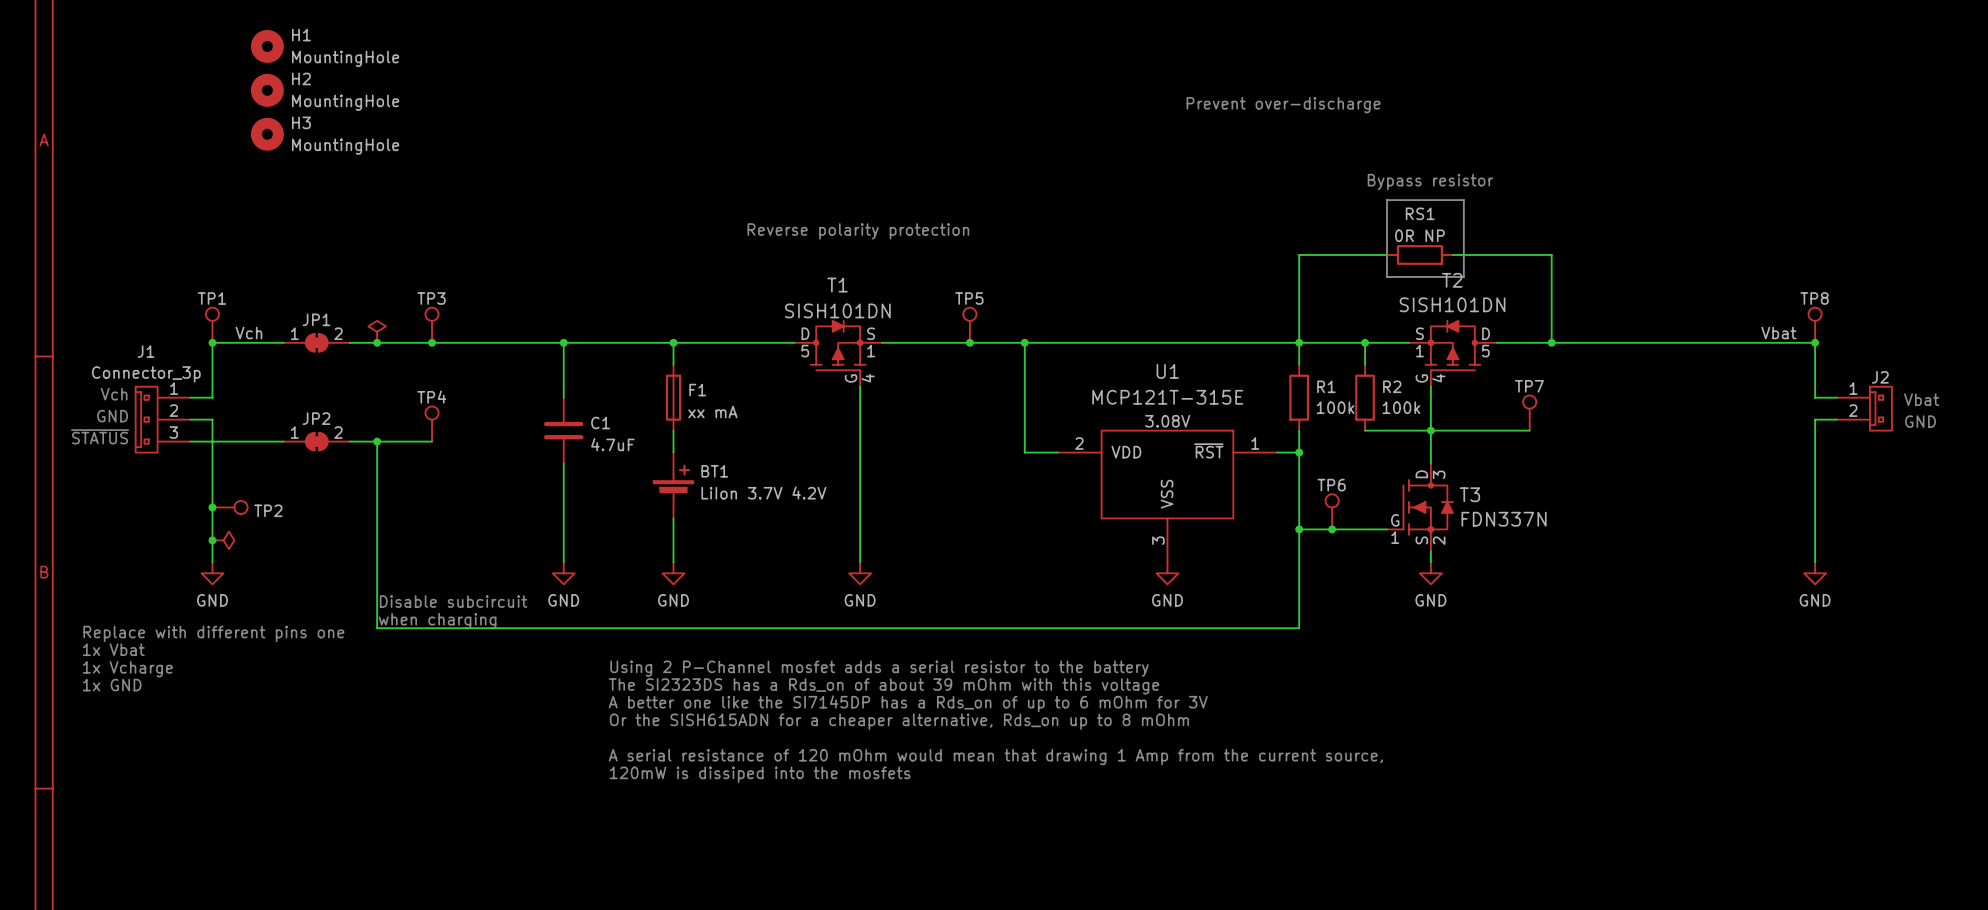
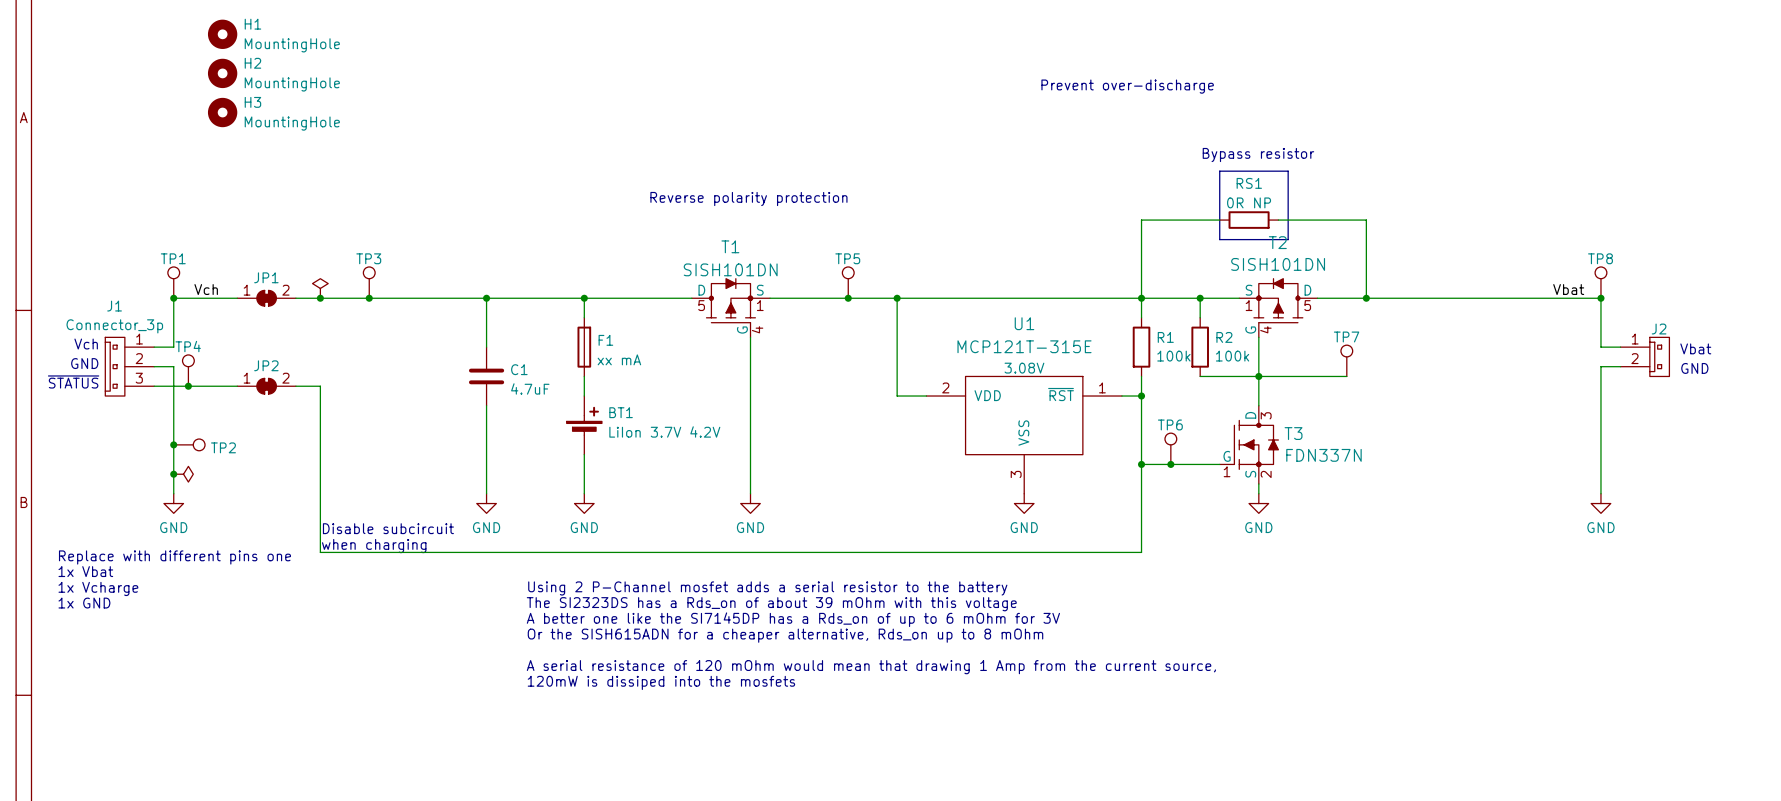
TP4 position: (432, 424) -> (188, 370)
junction: none -> (188, 386)
wire: (377, 441) (432, 441) -> none
junction: (377, 441) -> none

